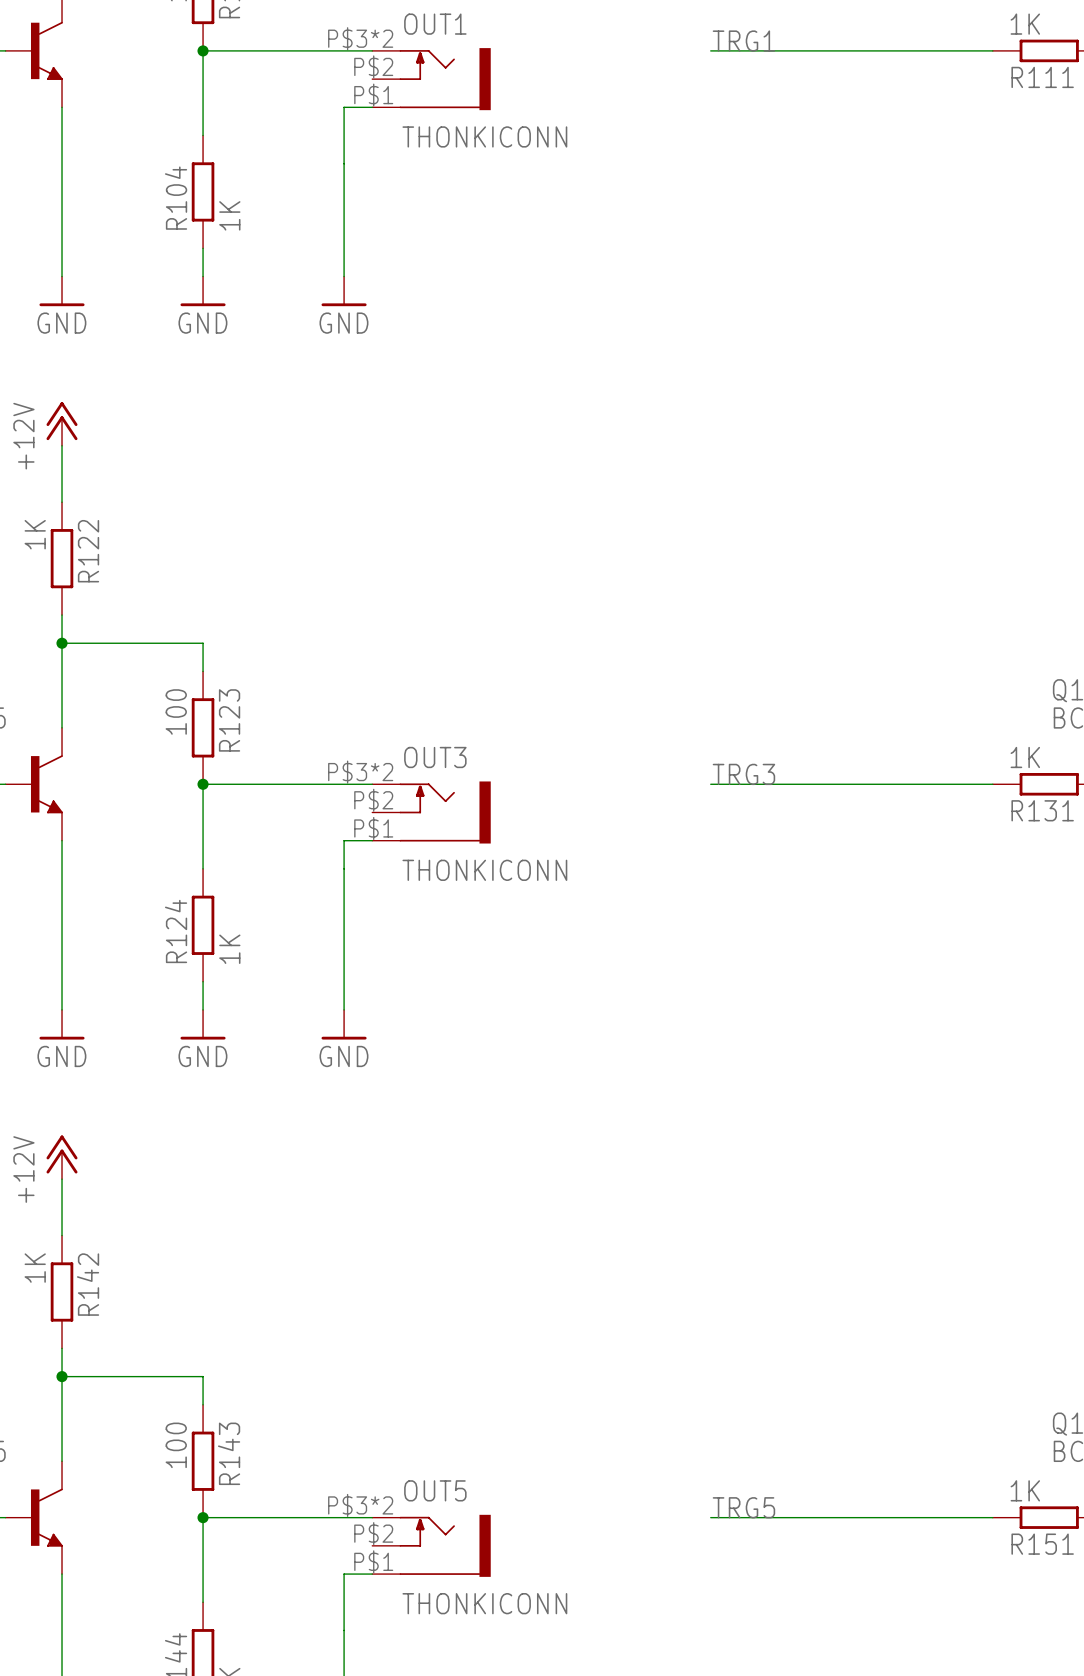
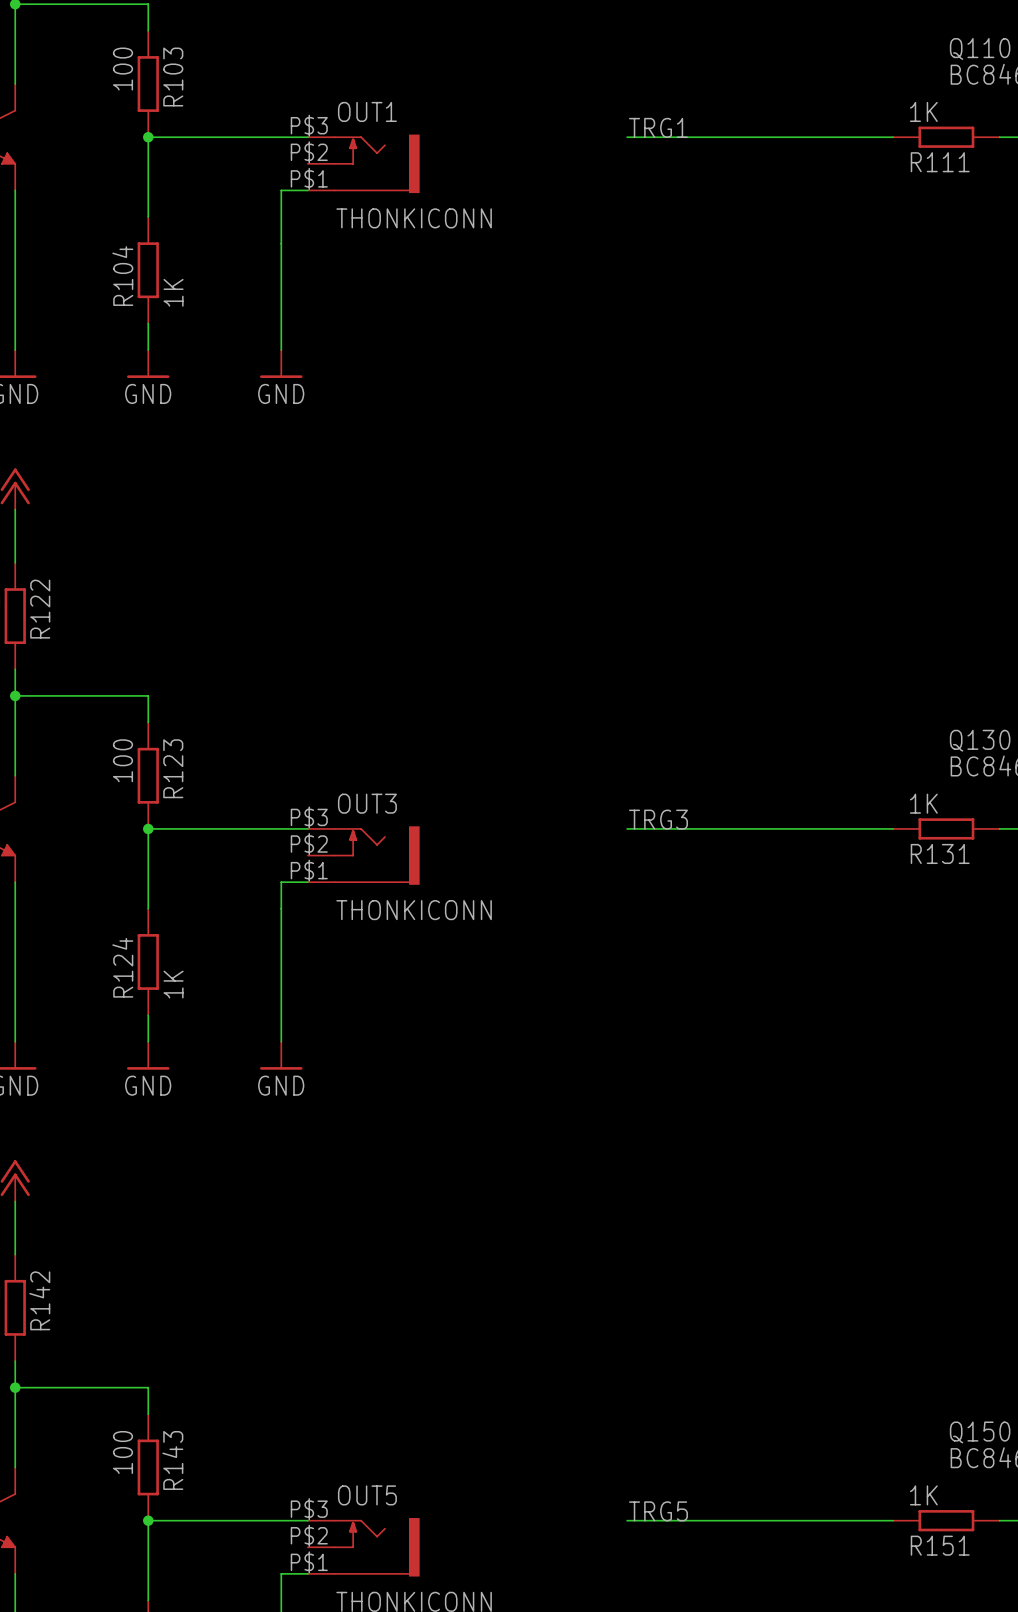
OUT1 pin number: P$3*2 (360, 38) -> P$3 (309, 125)
OUT3 pin number: P$3*2 (360, 772) -> P$3 (309, 817)
OUT5 pin number: P$3*2 (360, 1505) -> P$3 (309, 1509)

